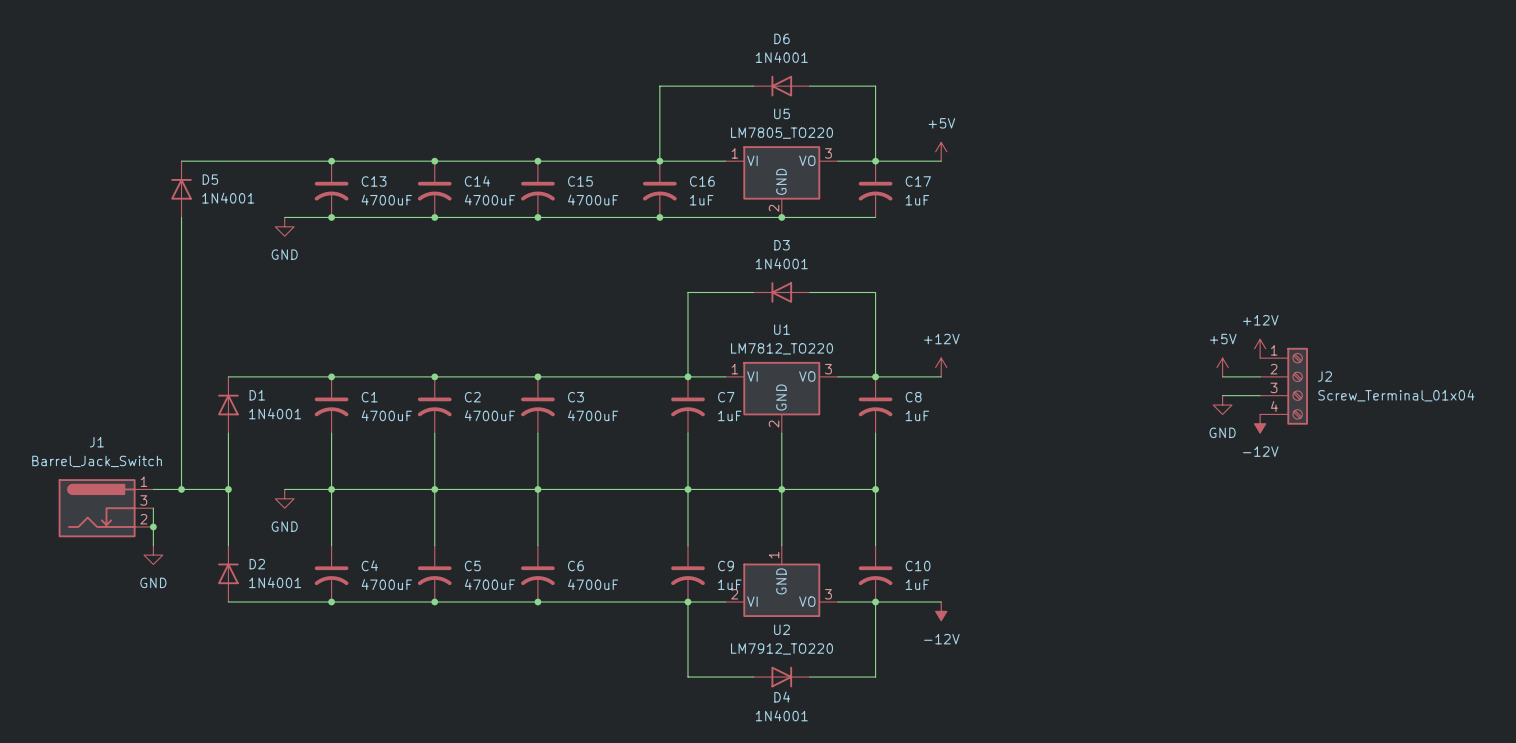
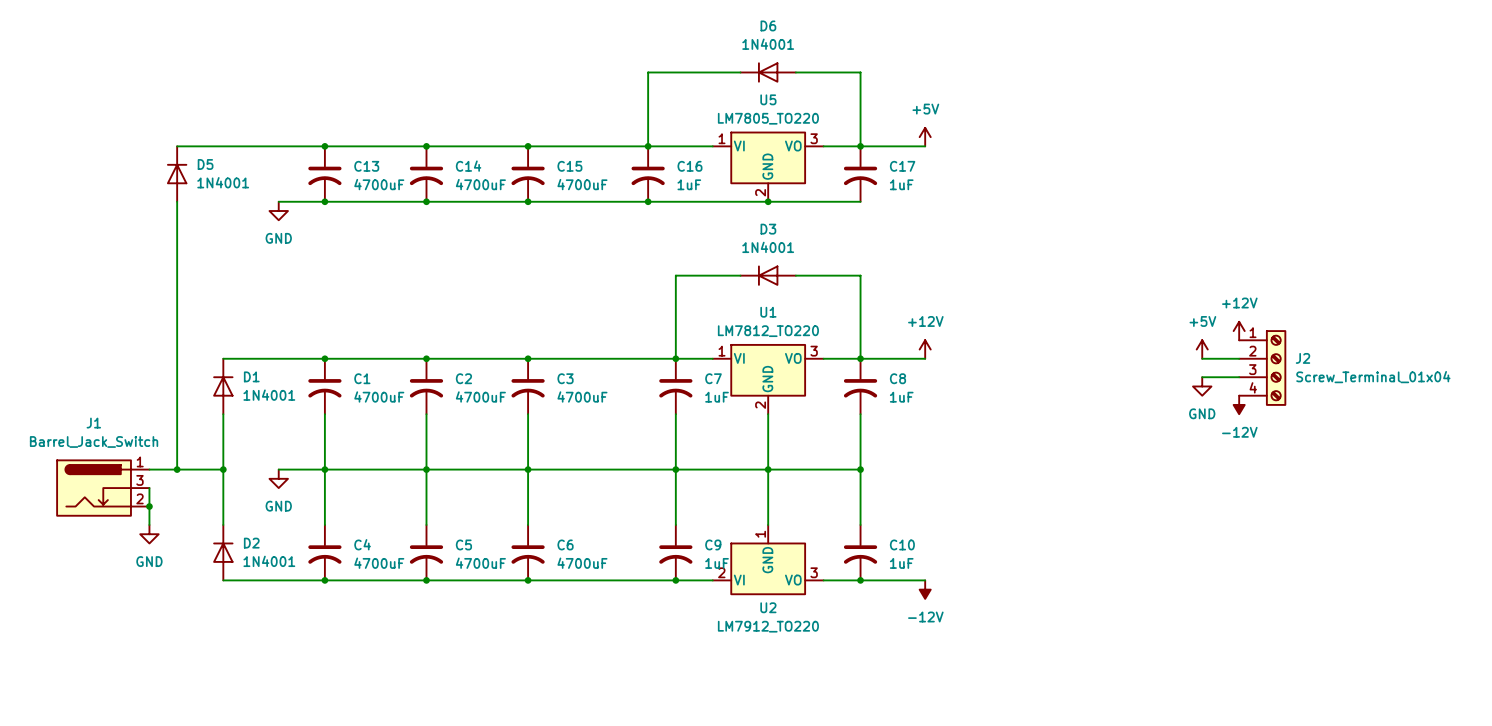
wire: (687, 602) (687, 677) (753, 677) -> none
wire: (875, 602) (875, 677) (809, 677) -> none
D4: 1N4001 (781, 677) -> none

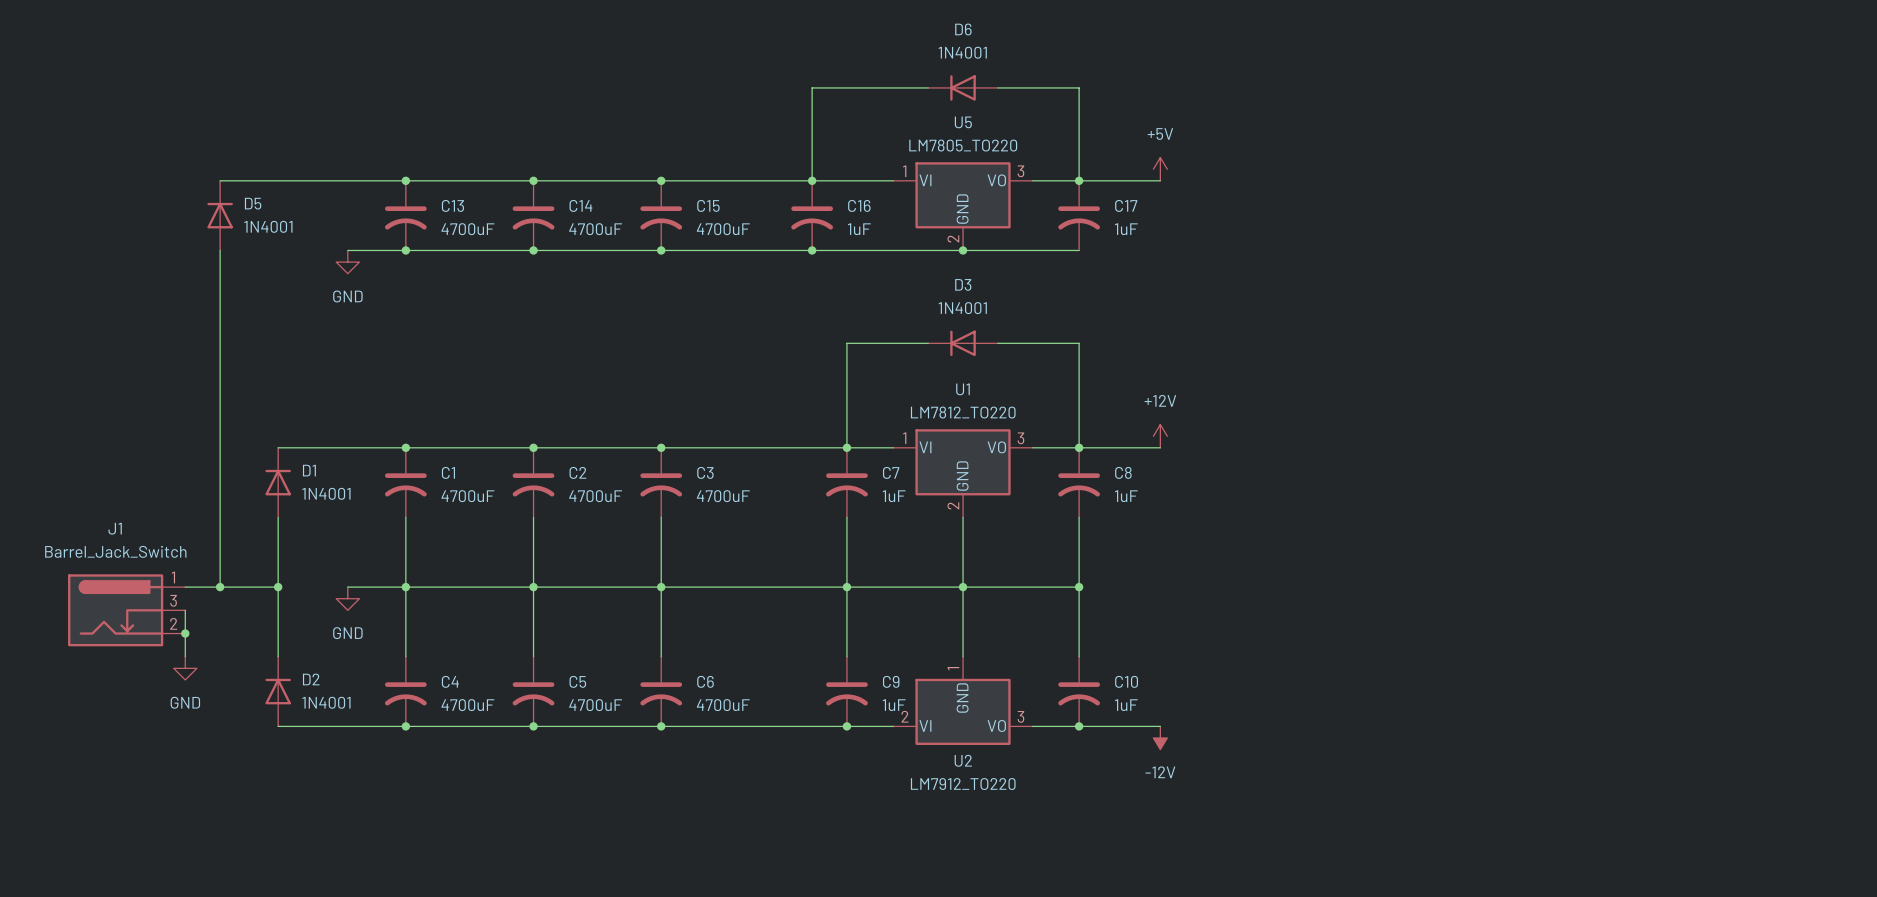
power symbol: +12V (1239, 331) -> none
power symbol: +5V (1202, 349) -> none
wire: (1202, 358) (1239, 358) -> none
J2: Screw_Terminal_01x04 (1262, 368) -> none
wire: (1202, 377) (1239, 377) -> none
power symbol: GND (1202, 386) -> none
power symbol: -12V (1239, 404) -> none

